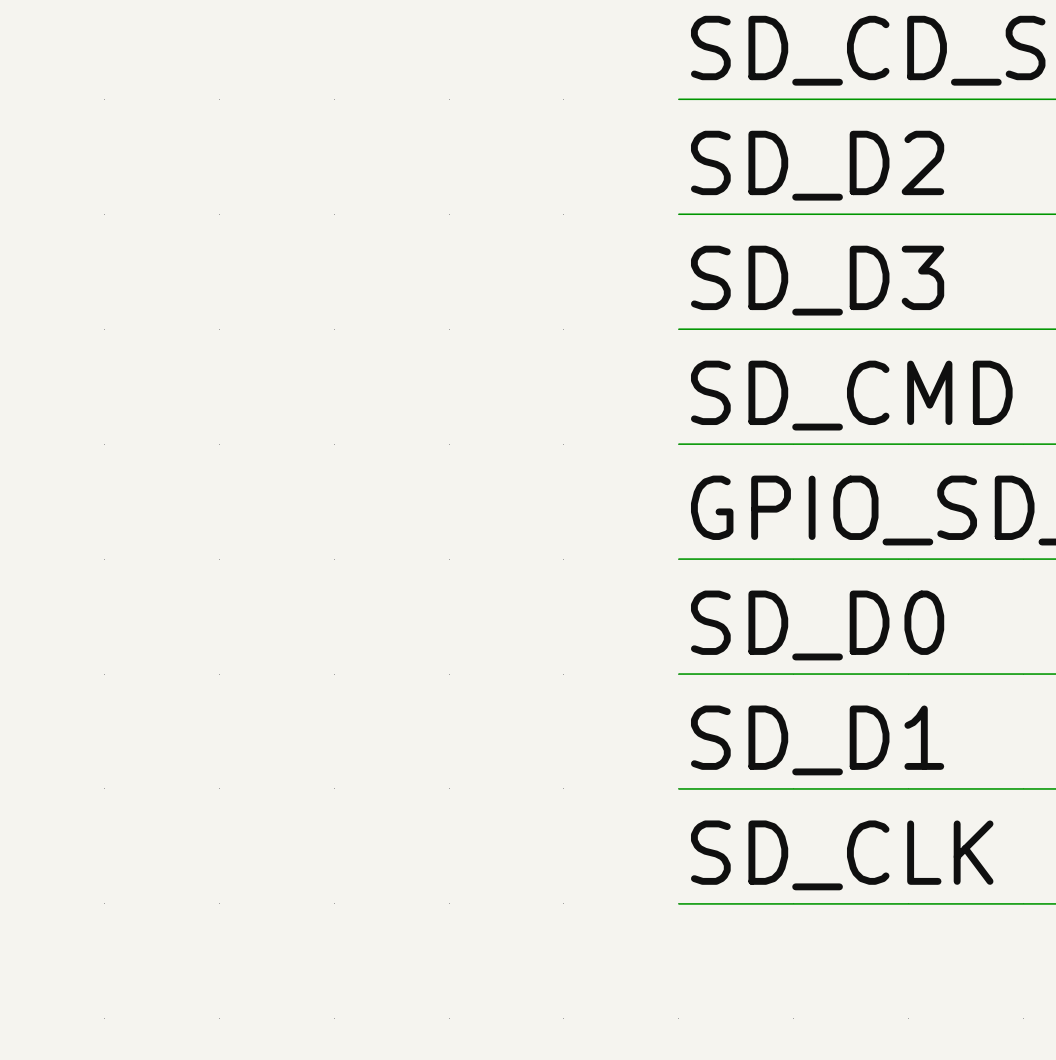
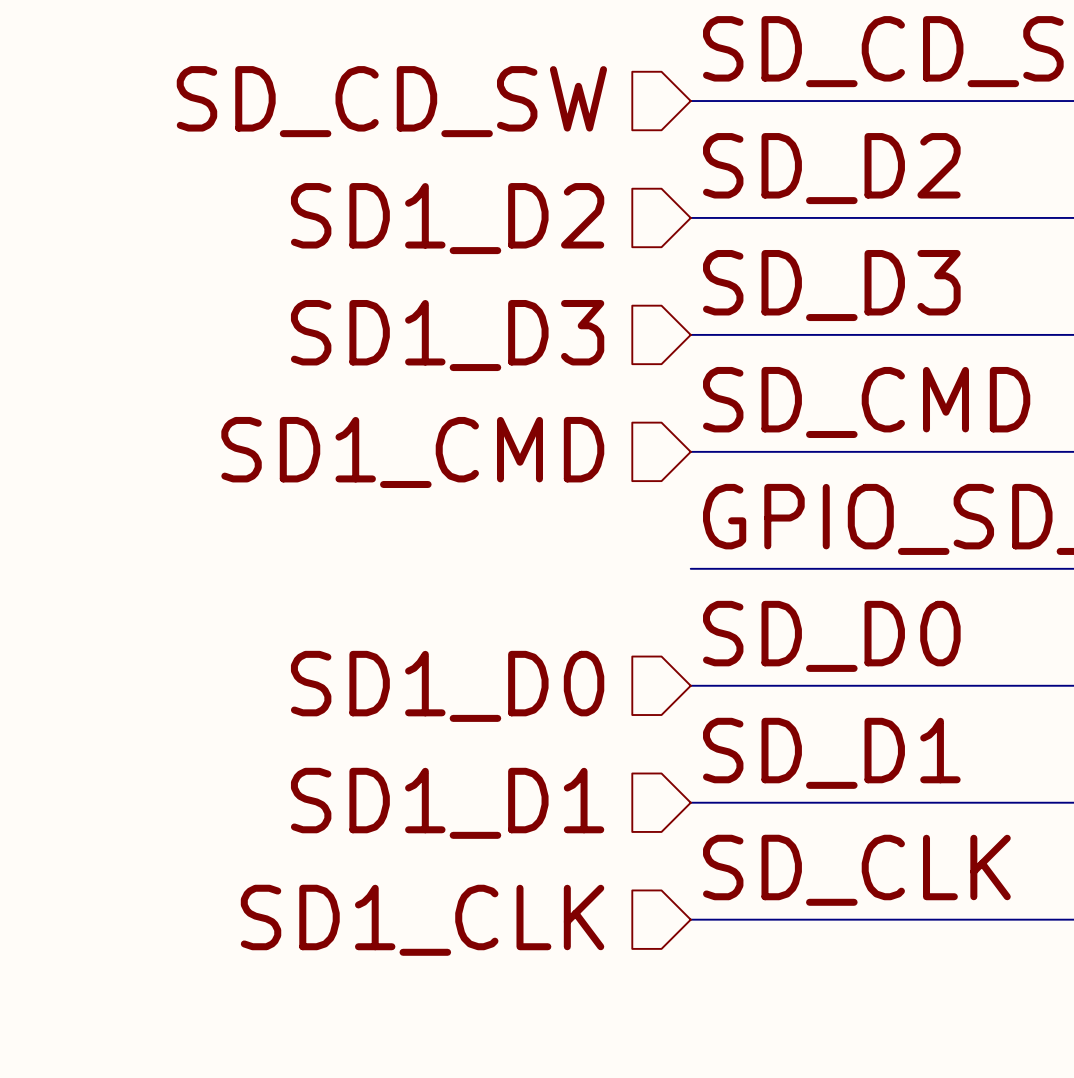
hierarchical label: none -> SD_CD_SW (391, 101)
hierarchical label: none -> SD1_D2 (447, 218)
hierarchical label: none -> SD1_D3 (447, 335)
hierarchical label: none -> SD1_CMD (412, 452)
hierarchical label: none -> SD1_D0 (447, 686)
hierarchical label: none -> SD1_D1 (447, 803)
hierarchical label: none -> SD1_CLK (422, 920)

